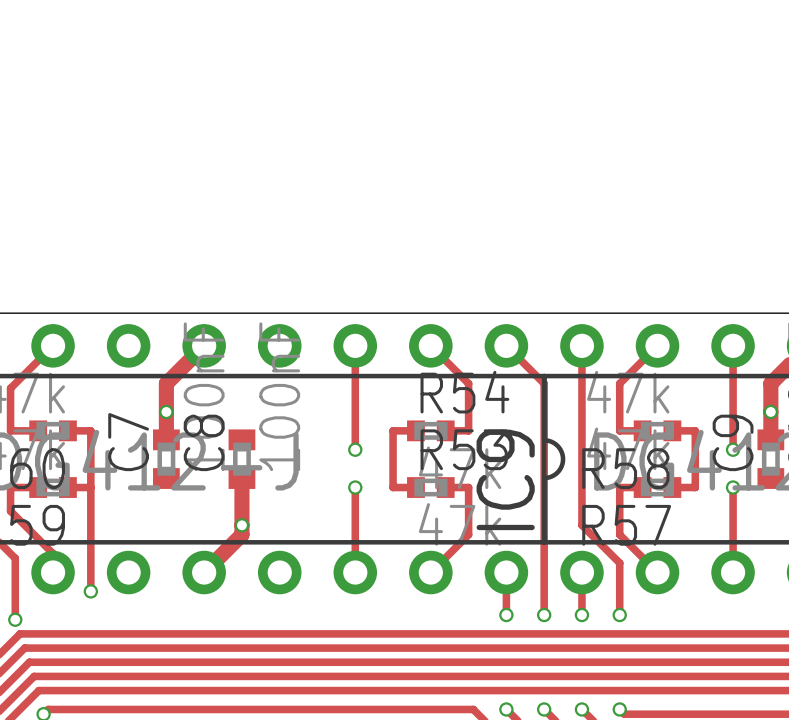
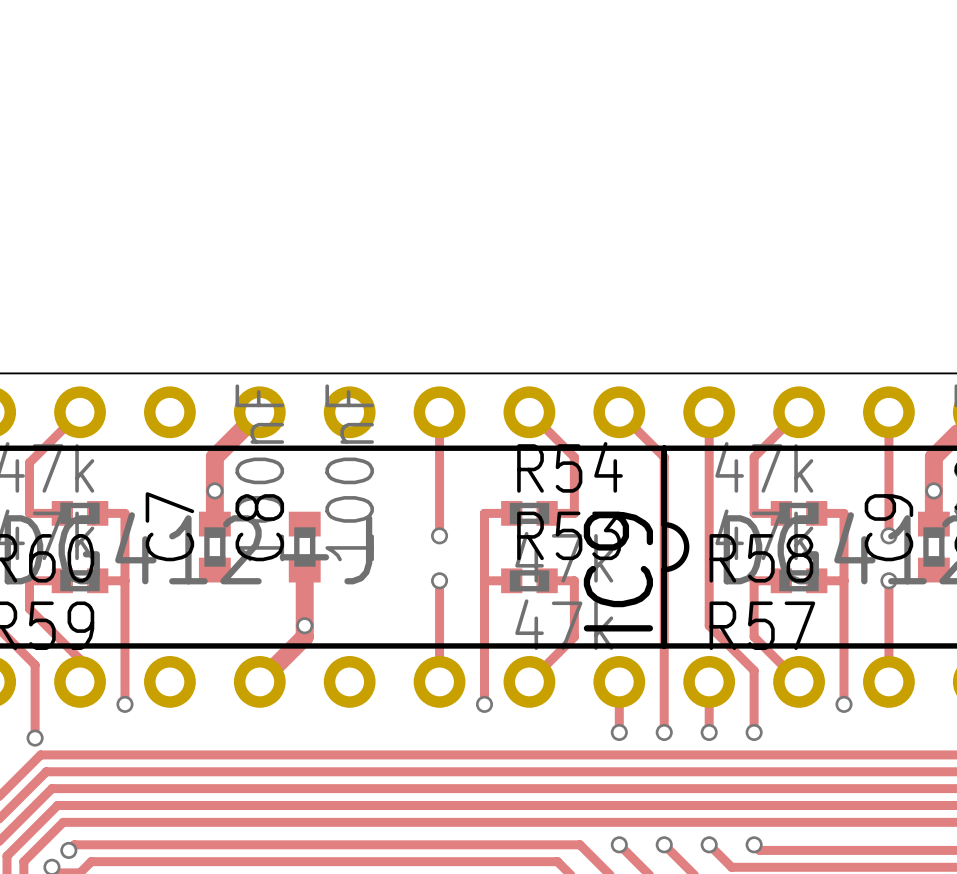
track: none -> (484, 580) (484, 704)
track: none -> (844, 580) (844, 704)
via: none -> (484, 704)
via: none -> (844, 704)

